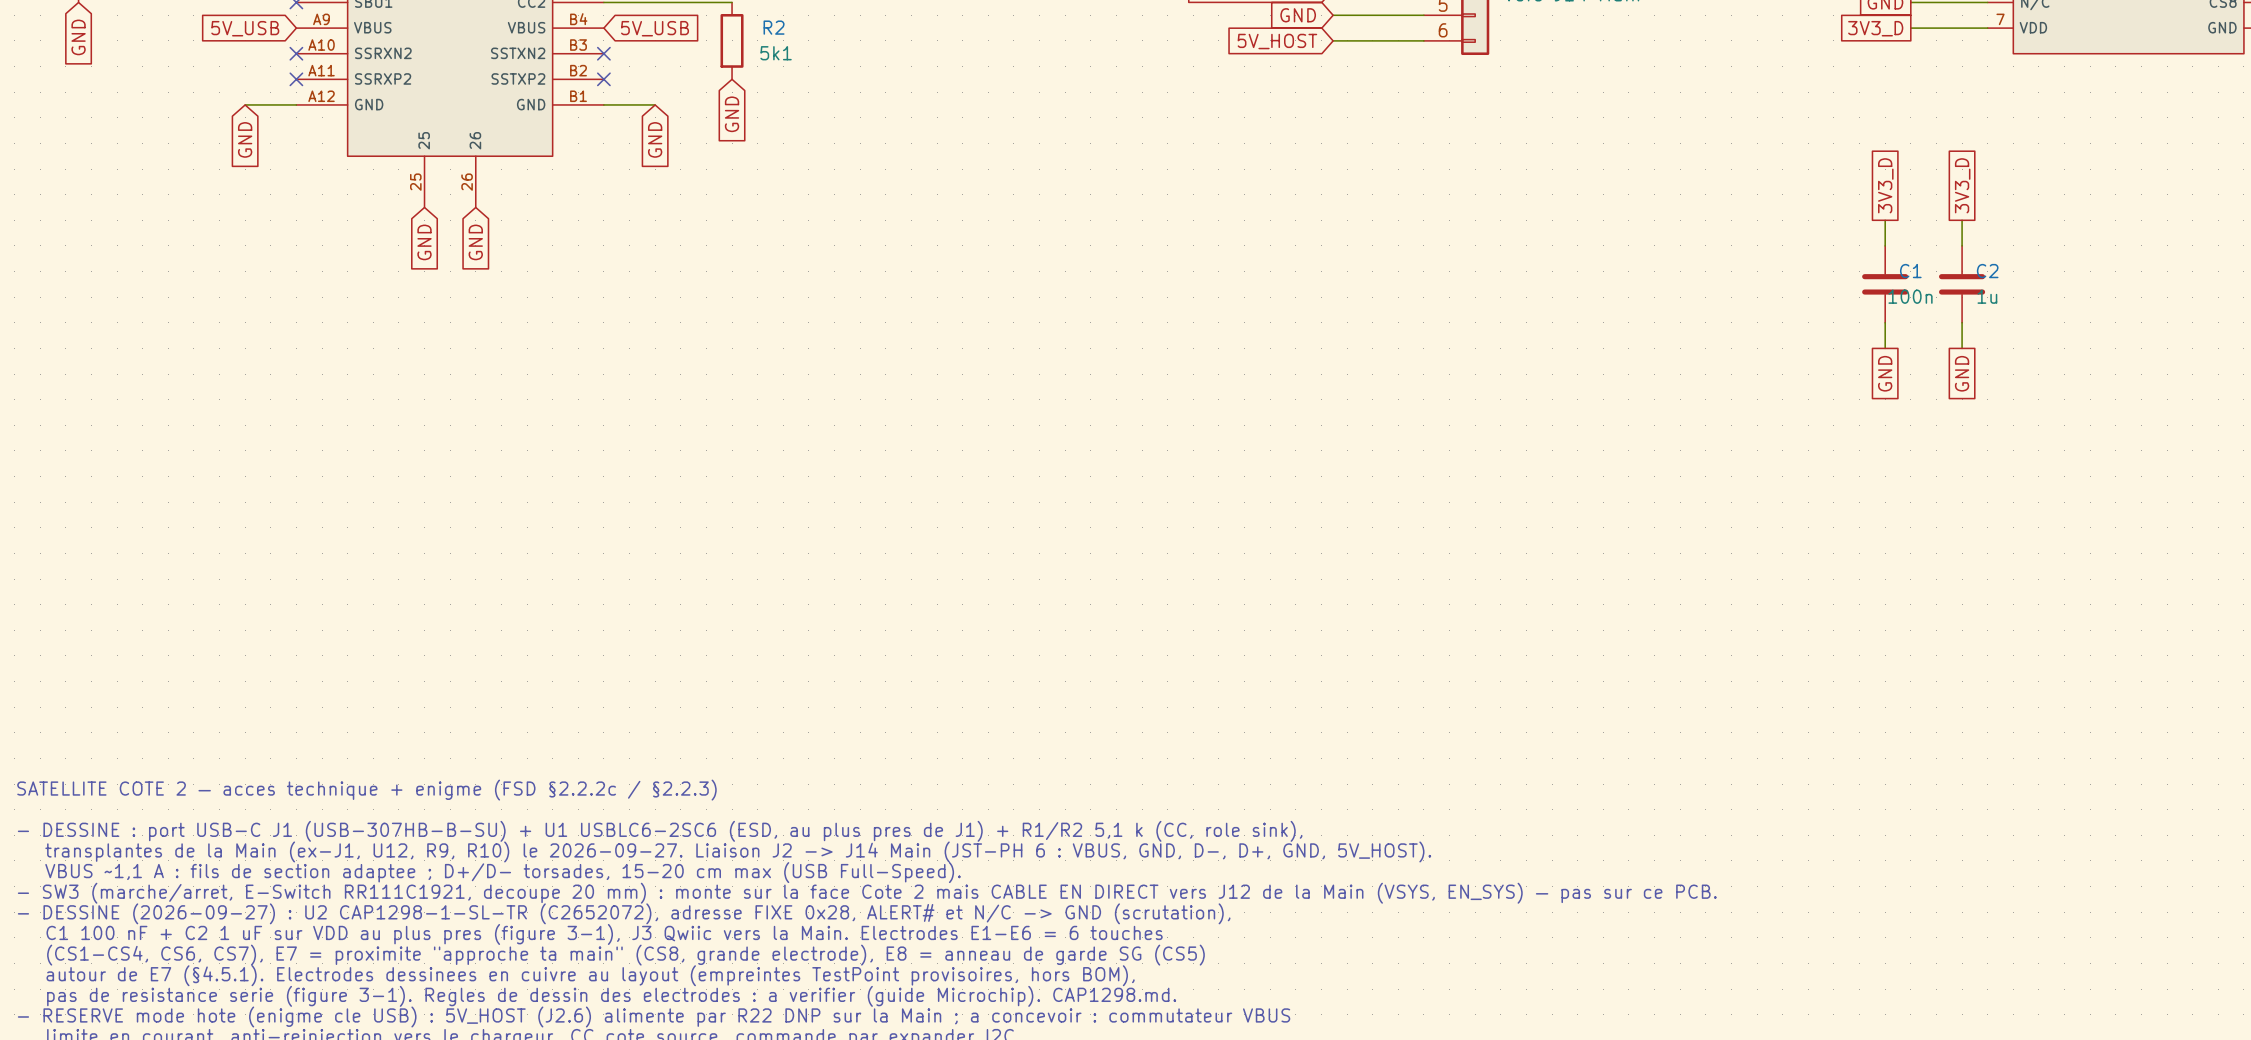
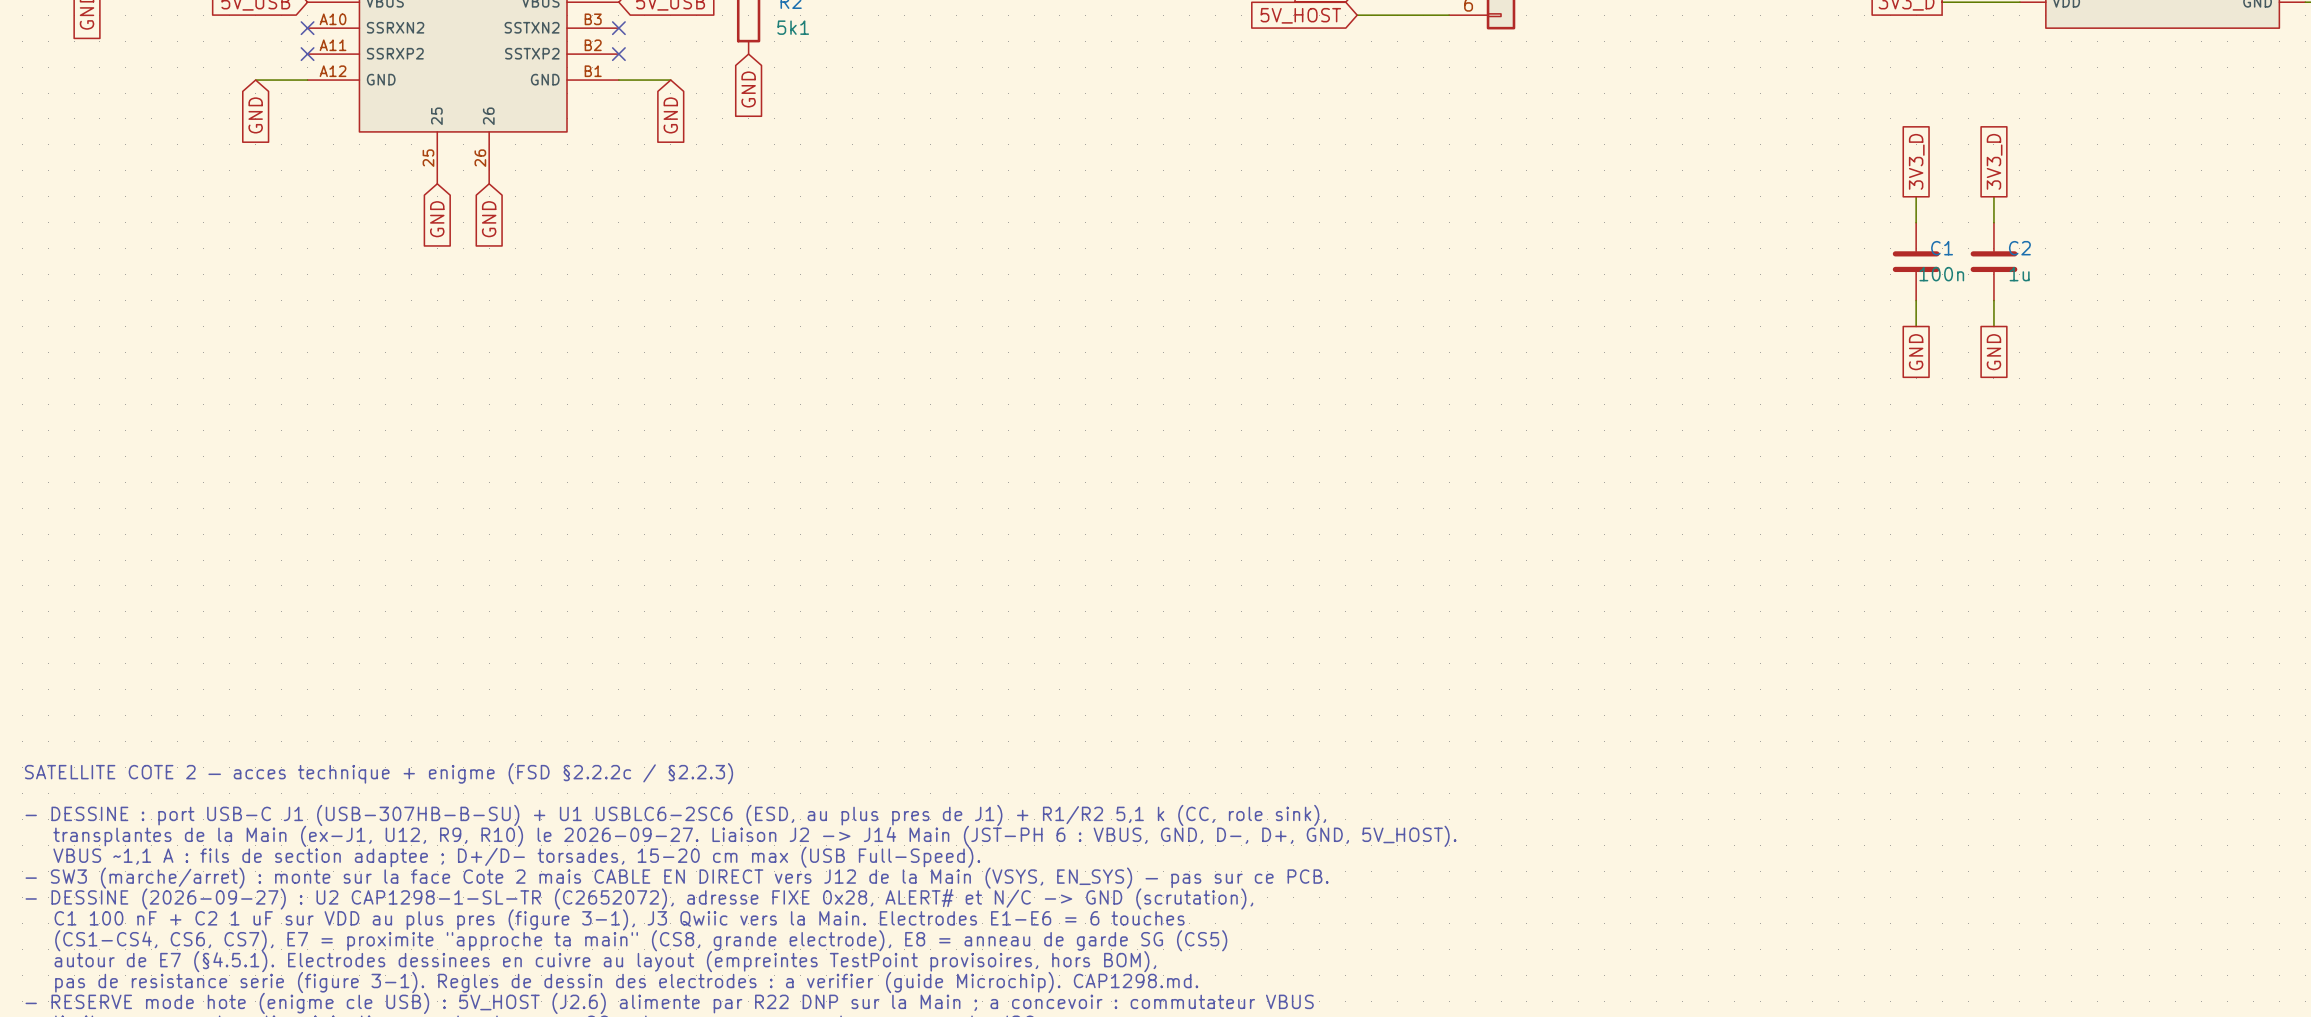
text: - SW3 (marche/arret, E-Switch RR111C1921, decoupe 20 mm) : monte sur la face Cote 2 mais CABLE EN DIRECT vers J12 de la Main (VSYS, EN_SYS) — pas sur ce PCB. (867, 893) -> - SW3 (marche/arret) : monte sur la face Cote 2 mais CABLE EN DIRECT vers J12 de la Main (VSYS, EN_SYS) — pas sur ce PCB. (677, 878)

